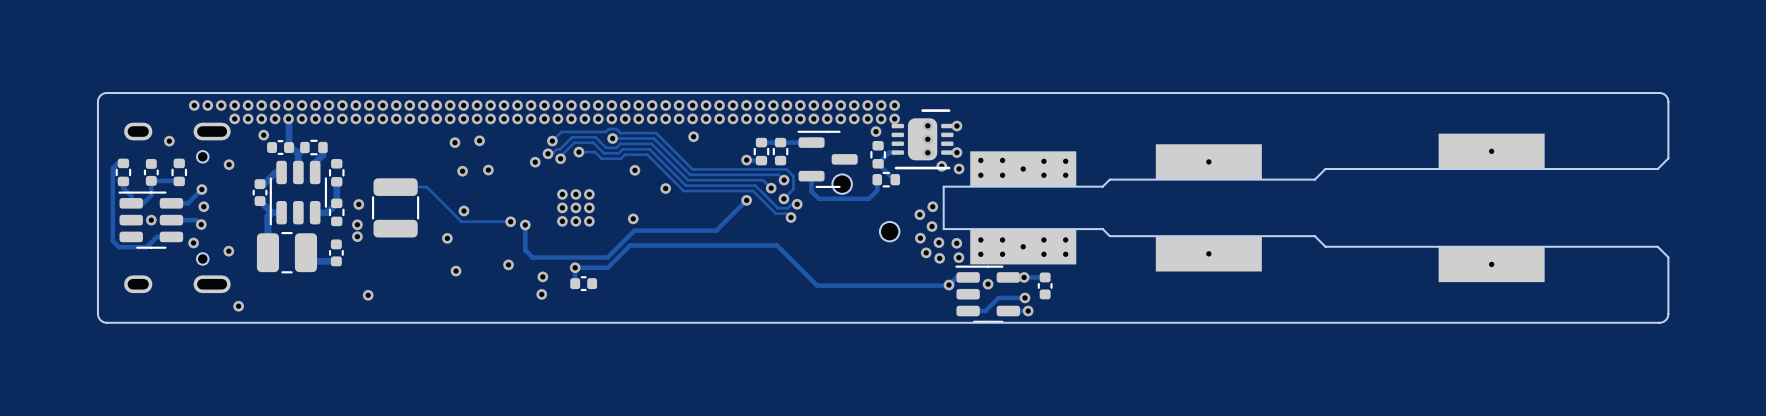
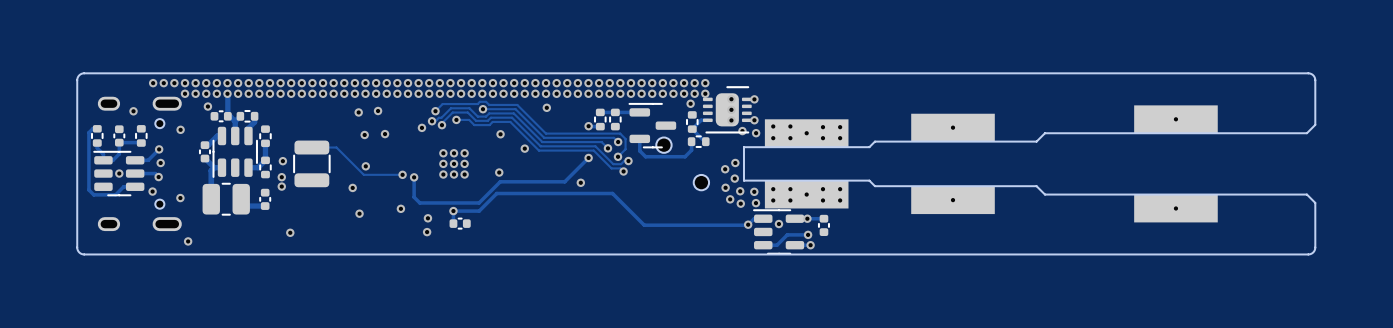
via: none -> (580, 182)

